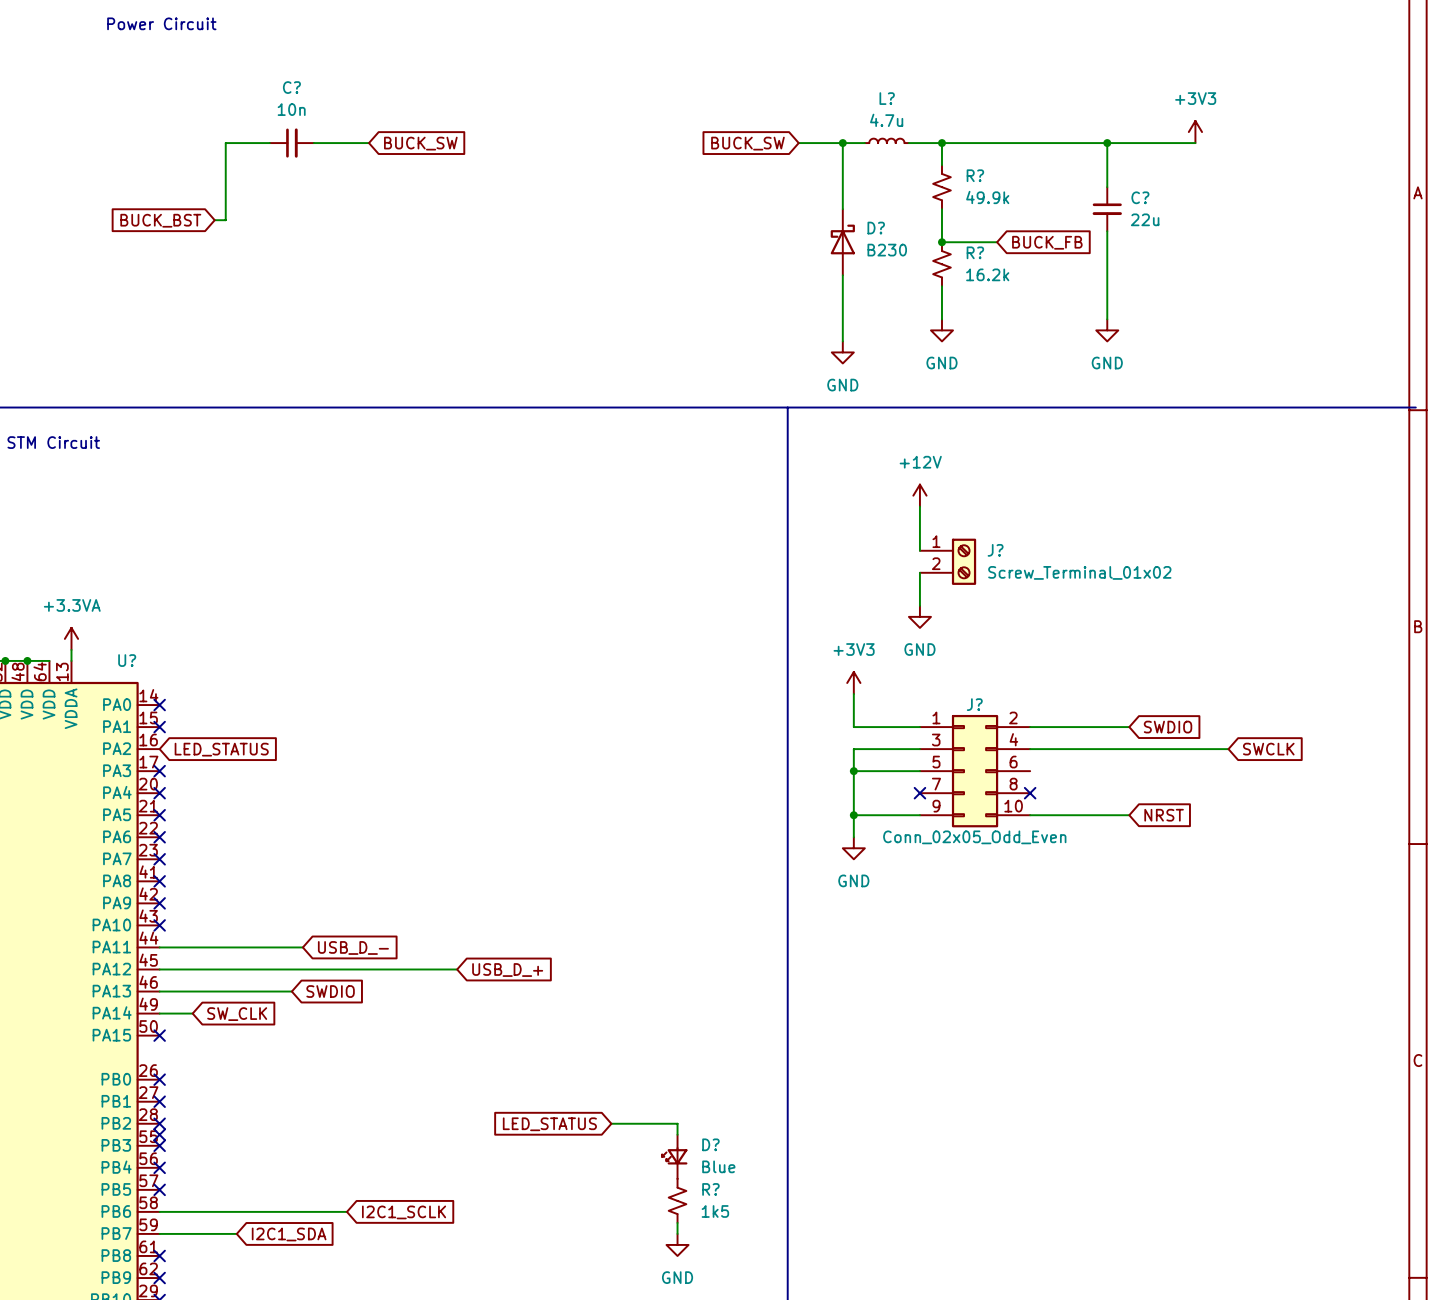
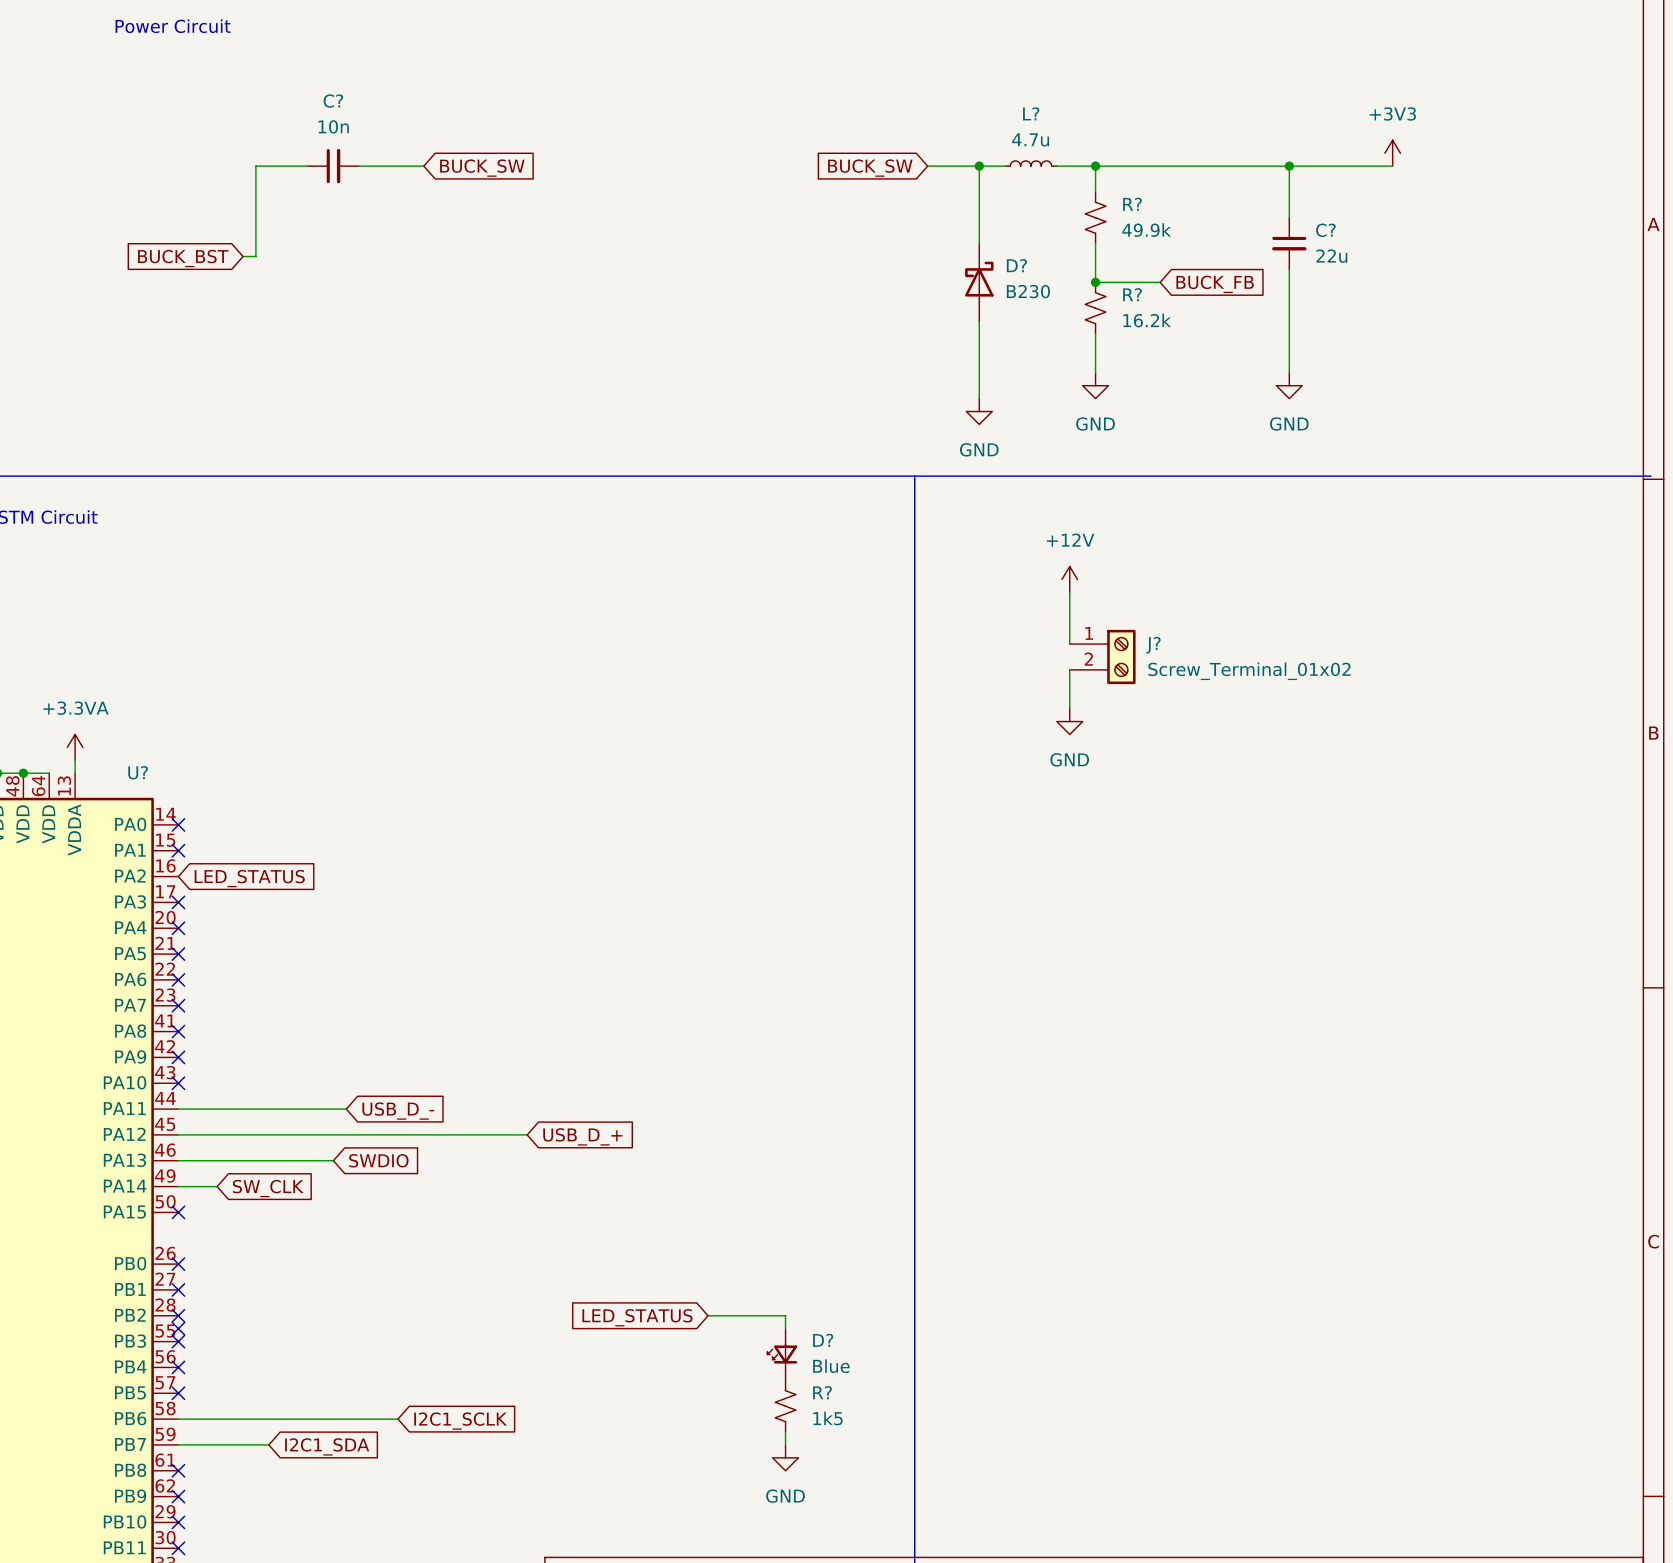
power symbol: +3V3 (853, 682) -> none
wire: (853, 694) (853, 727) (919, 727) -> none
wire: (1030, 727) (1129, 727) -> none
global label: SWDIO (1168, 727) -> none
wire: (919, 749) (853, 749) (853, 837) -> none
wire: (1030, 749) (1228, 749) -> none
global label: SWCLK (1268, 749) -> none
wire: (853, 771) (919, 771) -> none
junction: (853, 771) -> none
J?: Conn_02x05_Odd_Even (975, 771) -> none
no-connect mark: (919, 793) -> none
no-connect mark: (1030, 793) -> none
wire: (853, 815) (919, 815) -> none
junction: (853, 815) -> none
wire: (1030, 815) (1129, 815) -> none
global label: NRST (1164, 815) -> none
power symbol: GND (853, 848) -> none

